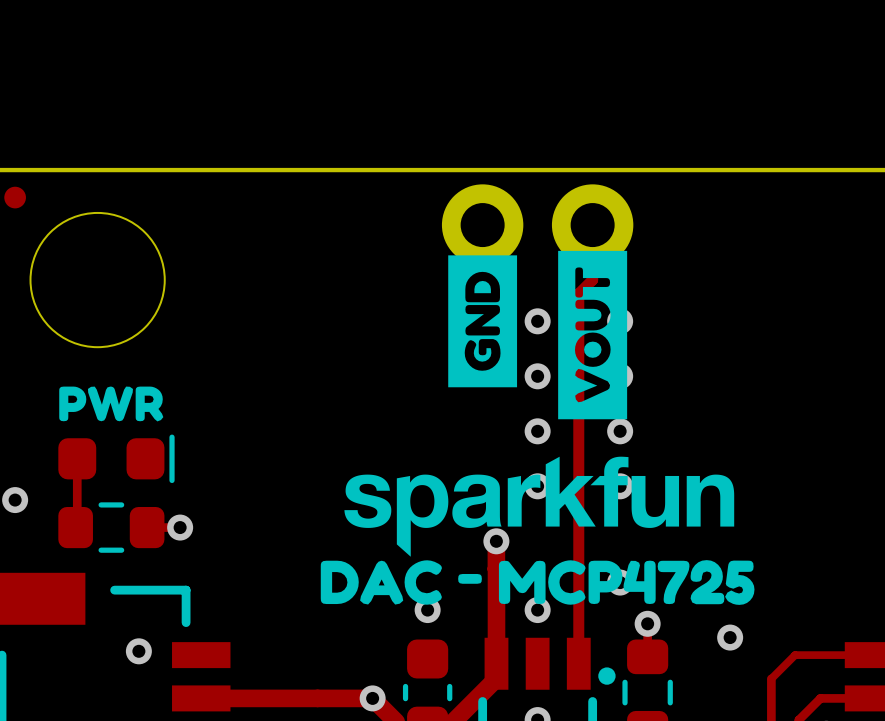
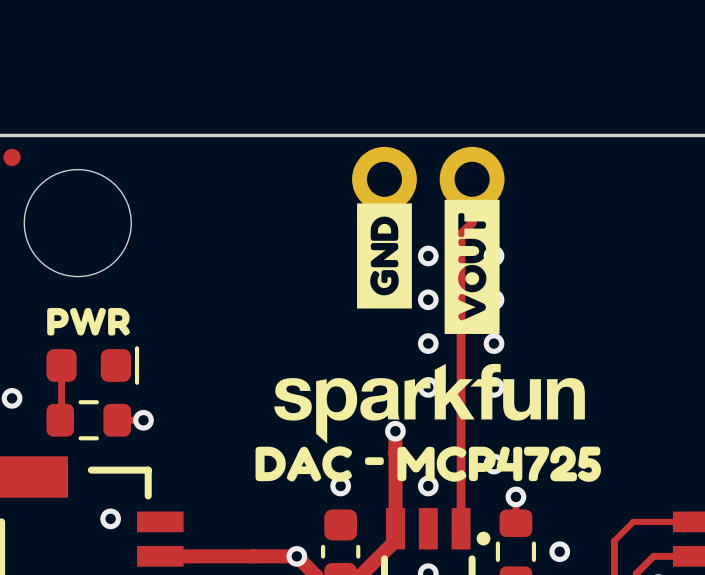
via: (730, 637) -> none
via: none -> (559, 551)

